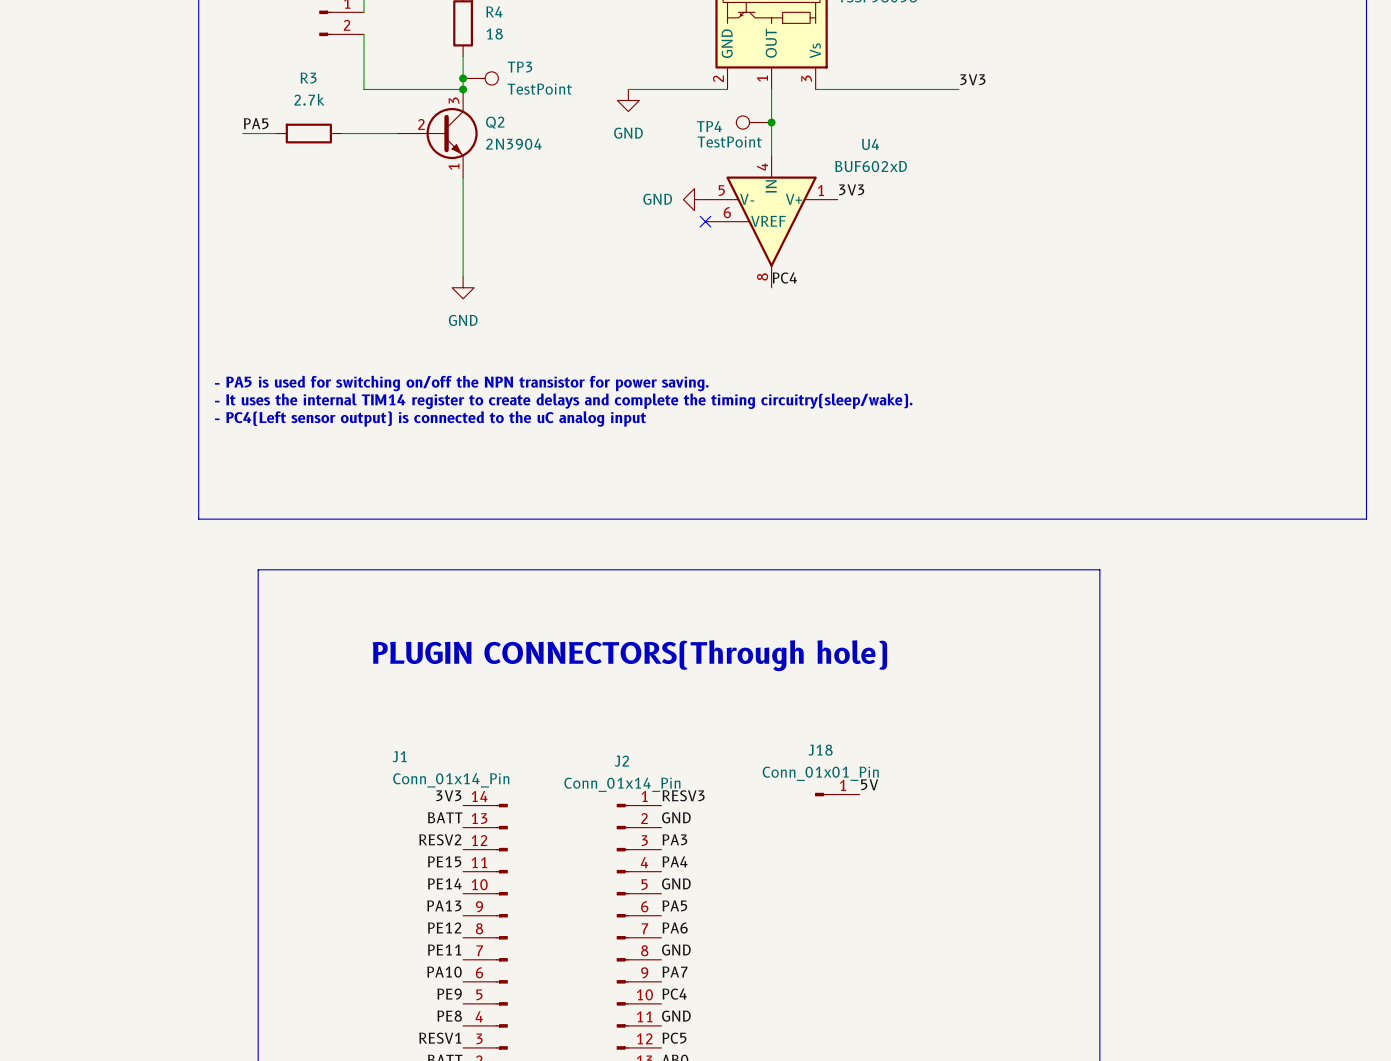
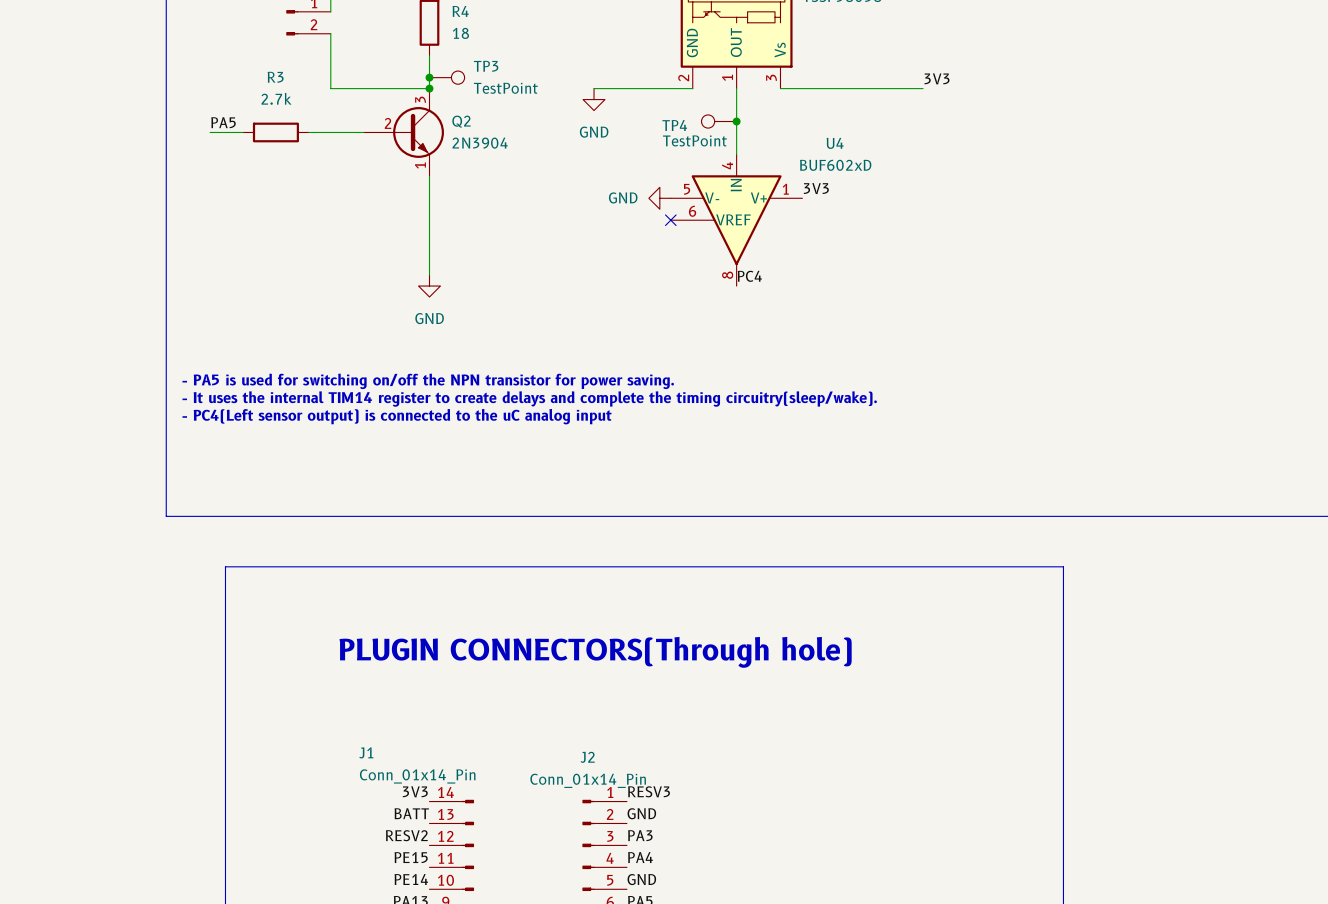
label: 5V (869, 784) -> none
J18: Conn_01x01_Pin (837, 794) -> none

